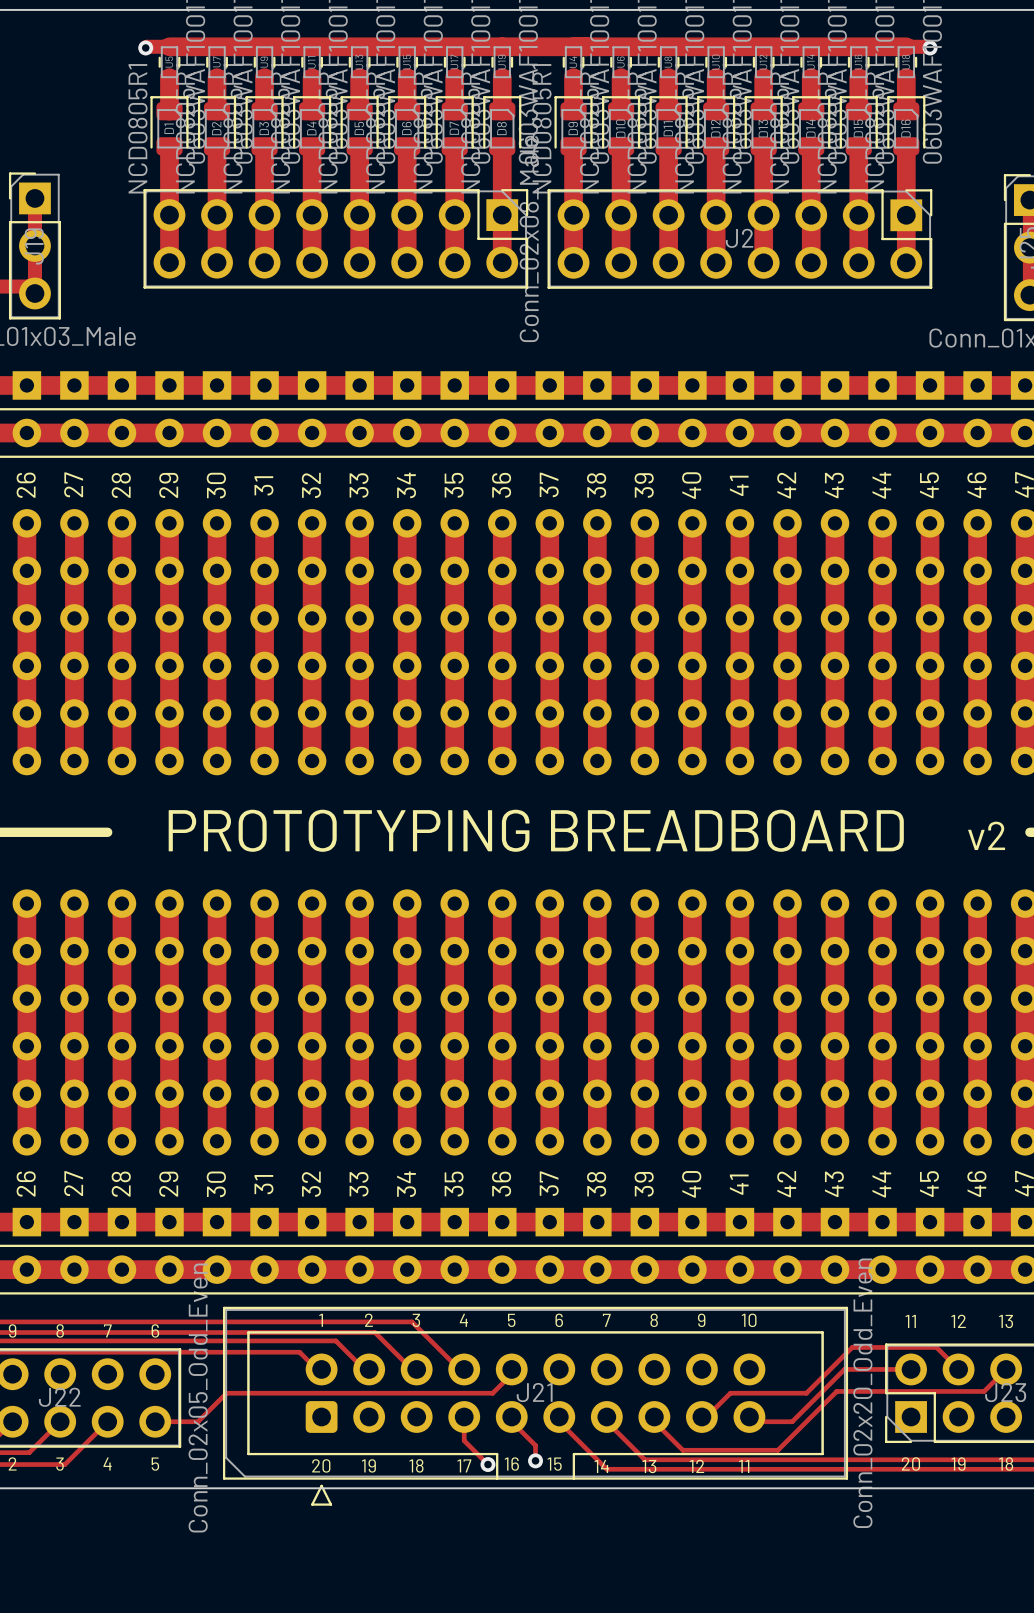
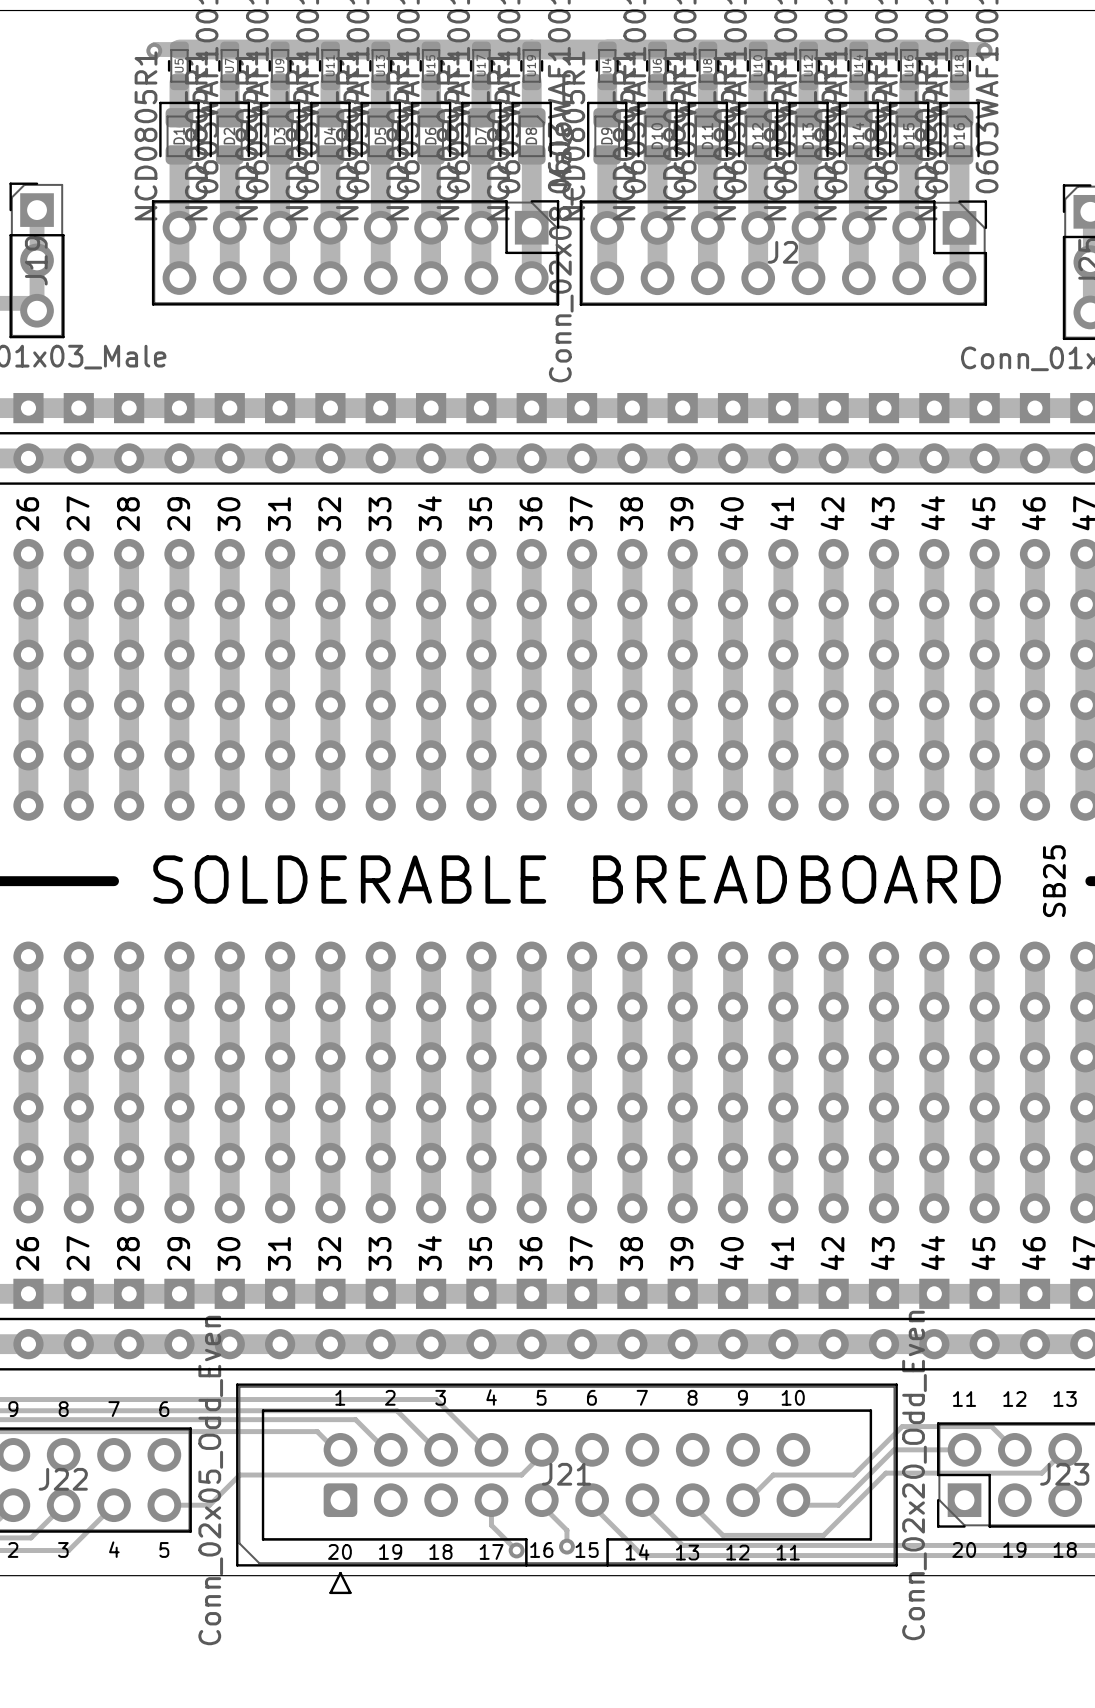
text: PROTOTYPING BREADBOARD (536, 830) -> SOLDERABLE BREADBOARD (577, 879)
text: v2 (986, 835) -> SB25 (1054, 881)

